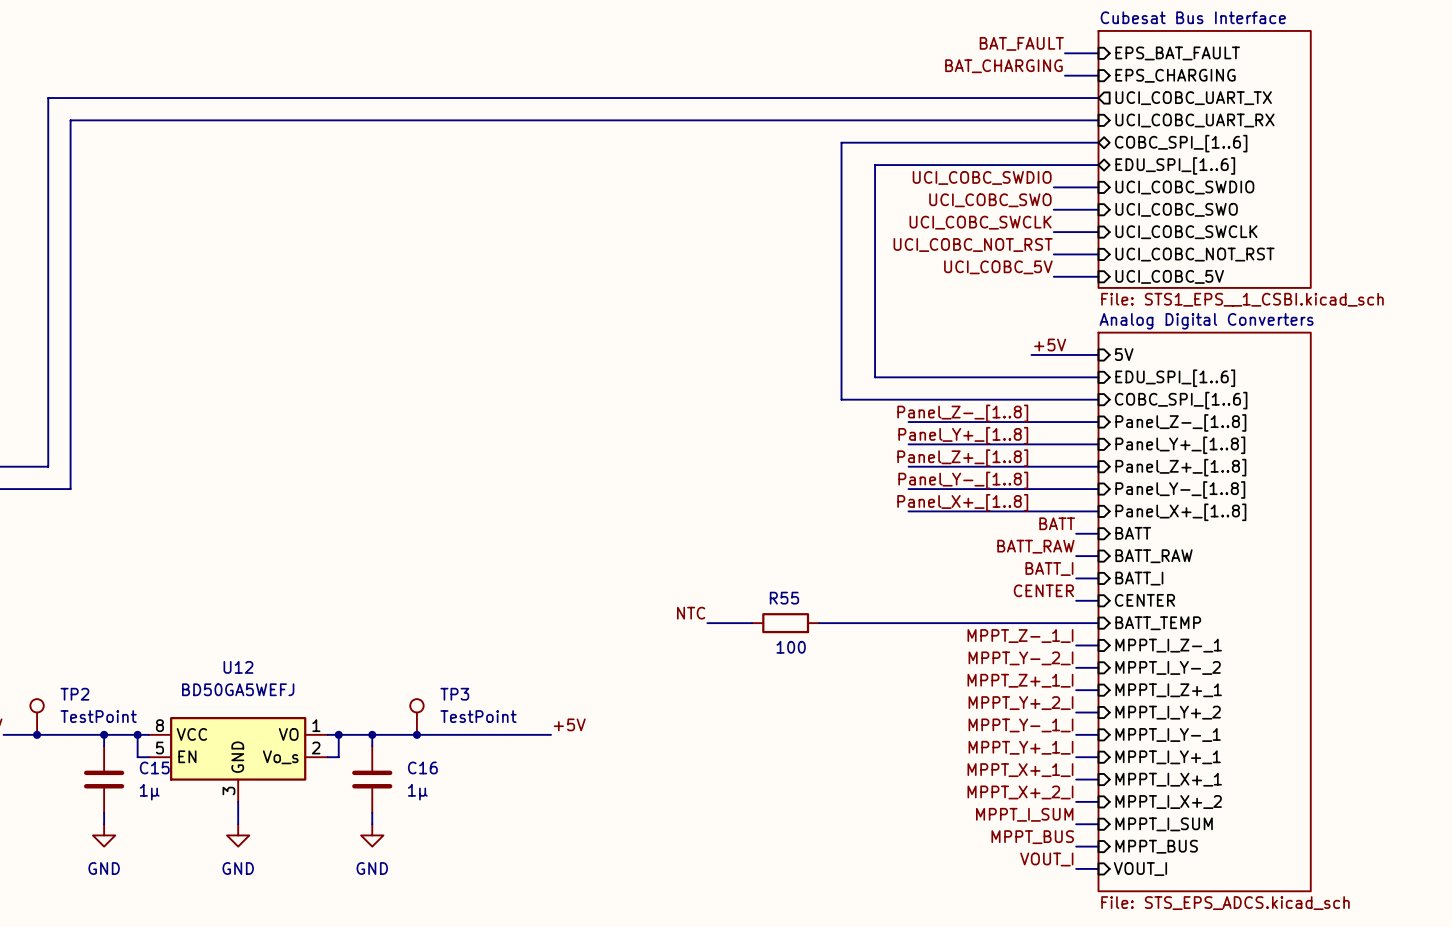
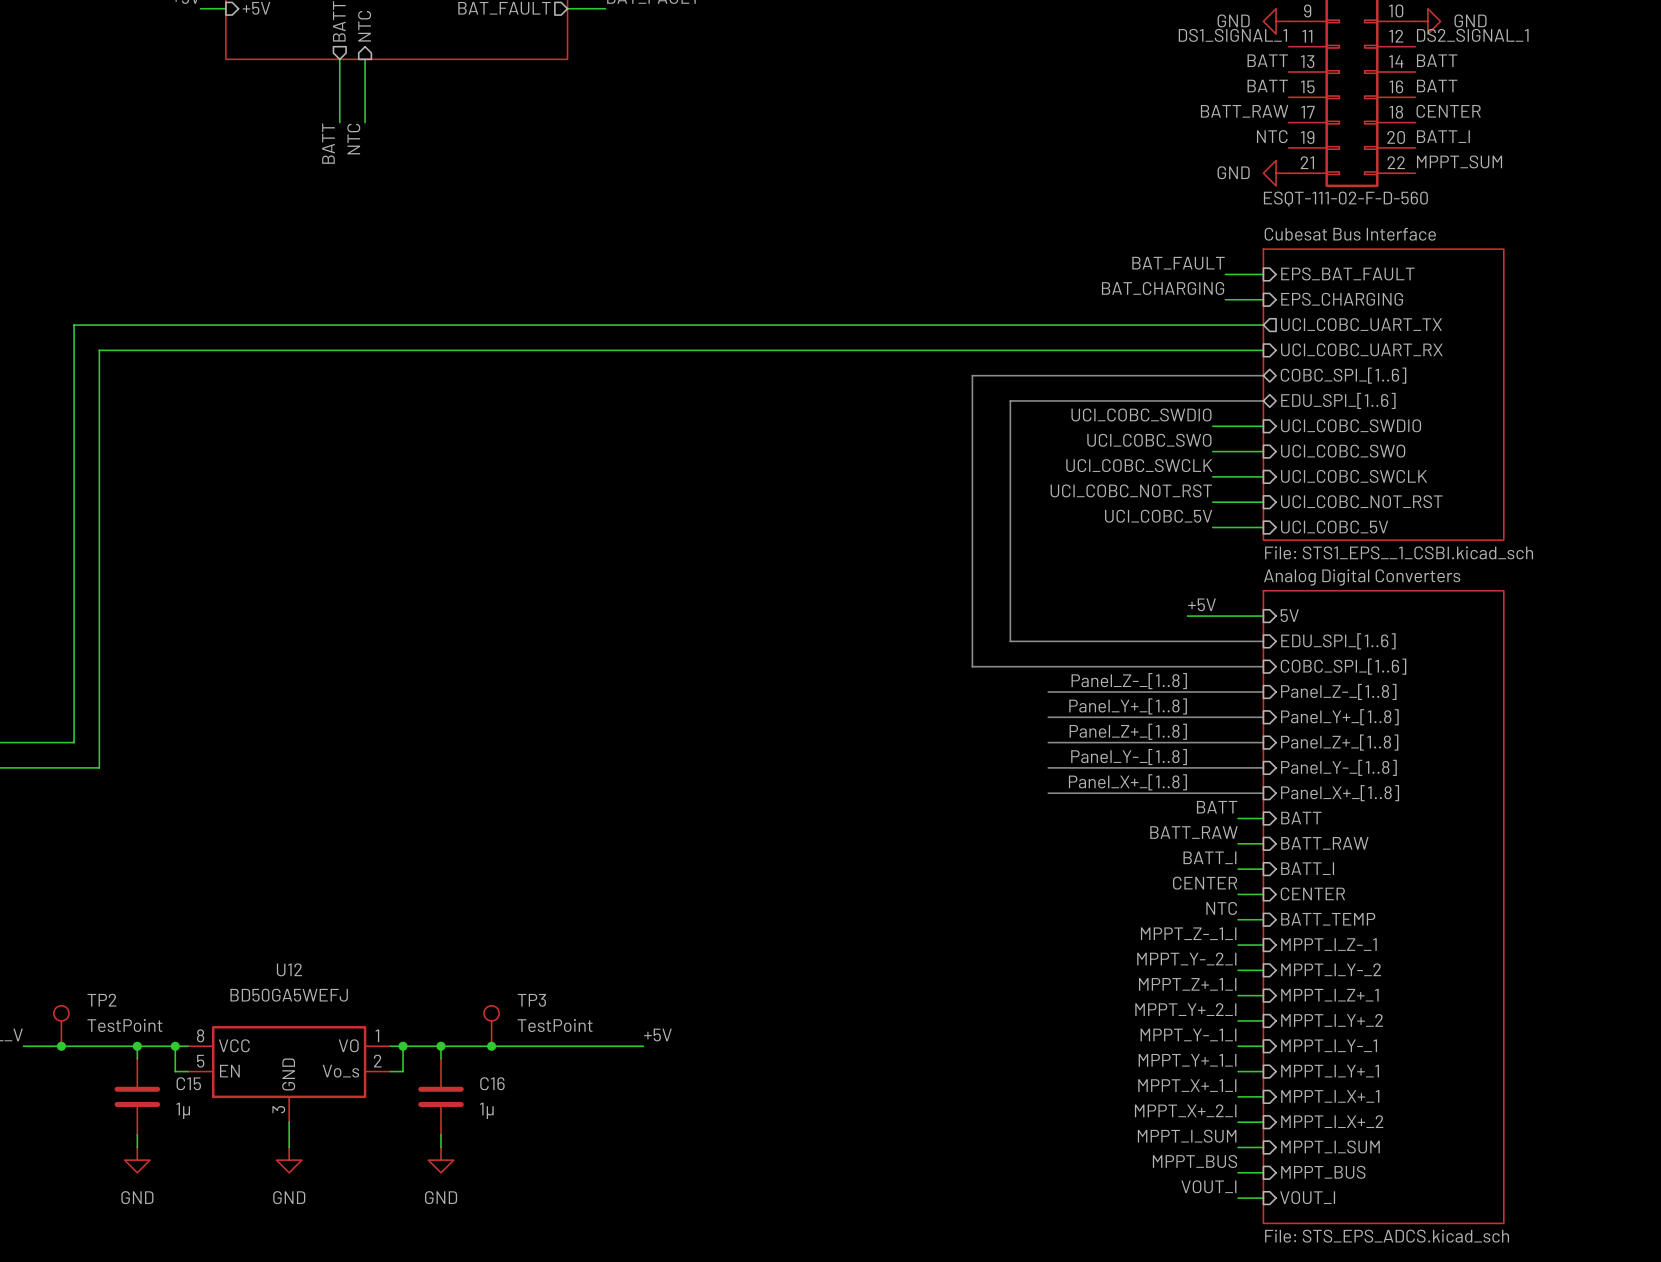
label: NTC (691, 613) -> none
label: none -> NTC (1221, 908)
wire: (707, 623) (752, 623) -> none
R55: 100 (785, 623) -> none
wire: (819, 623) (1076, 623) -> none

